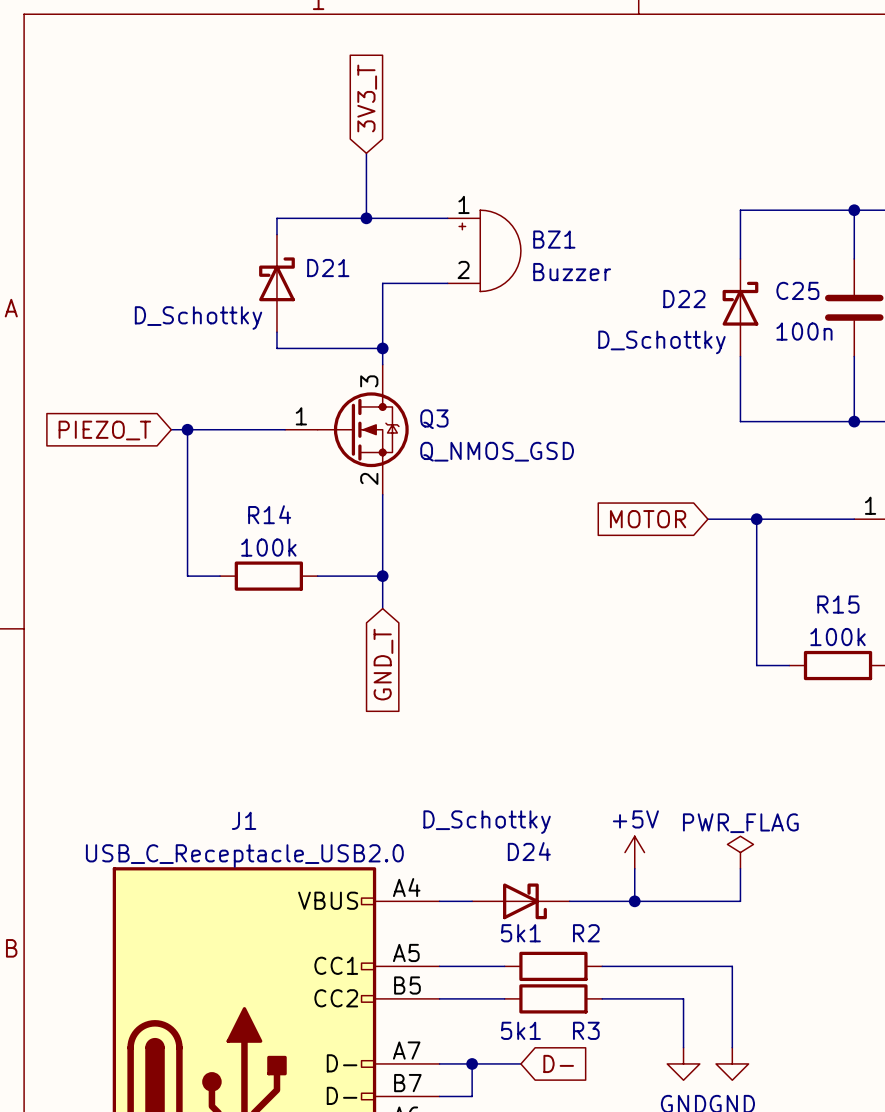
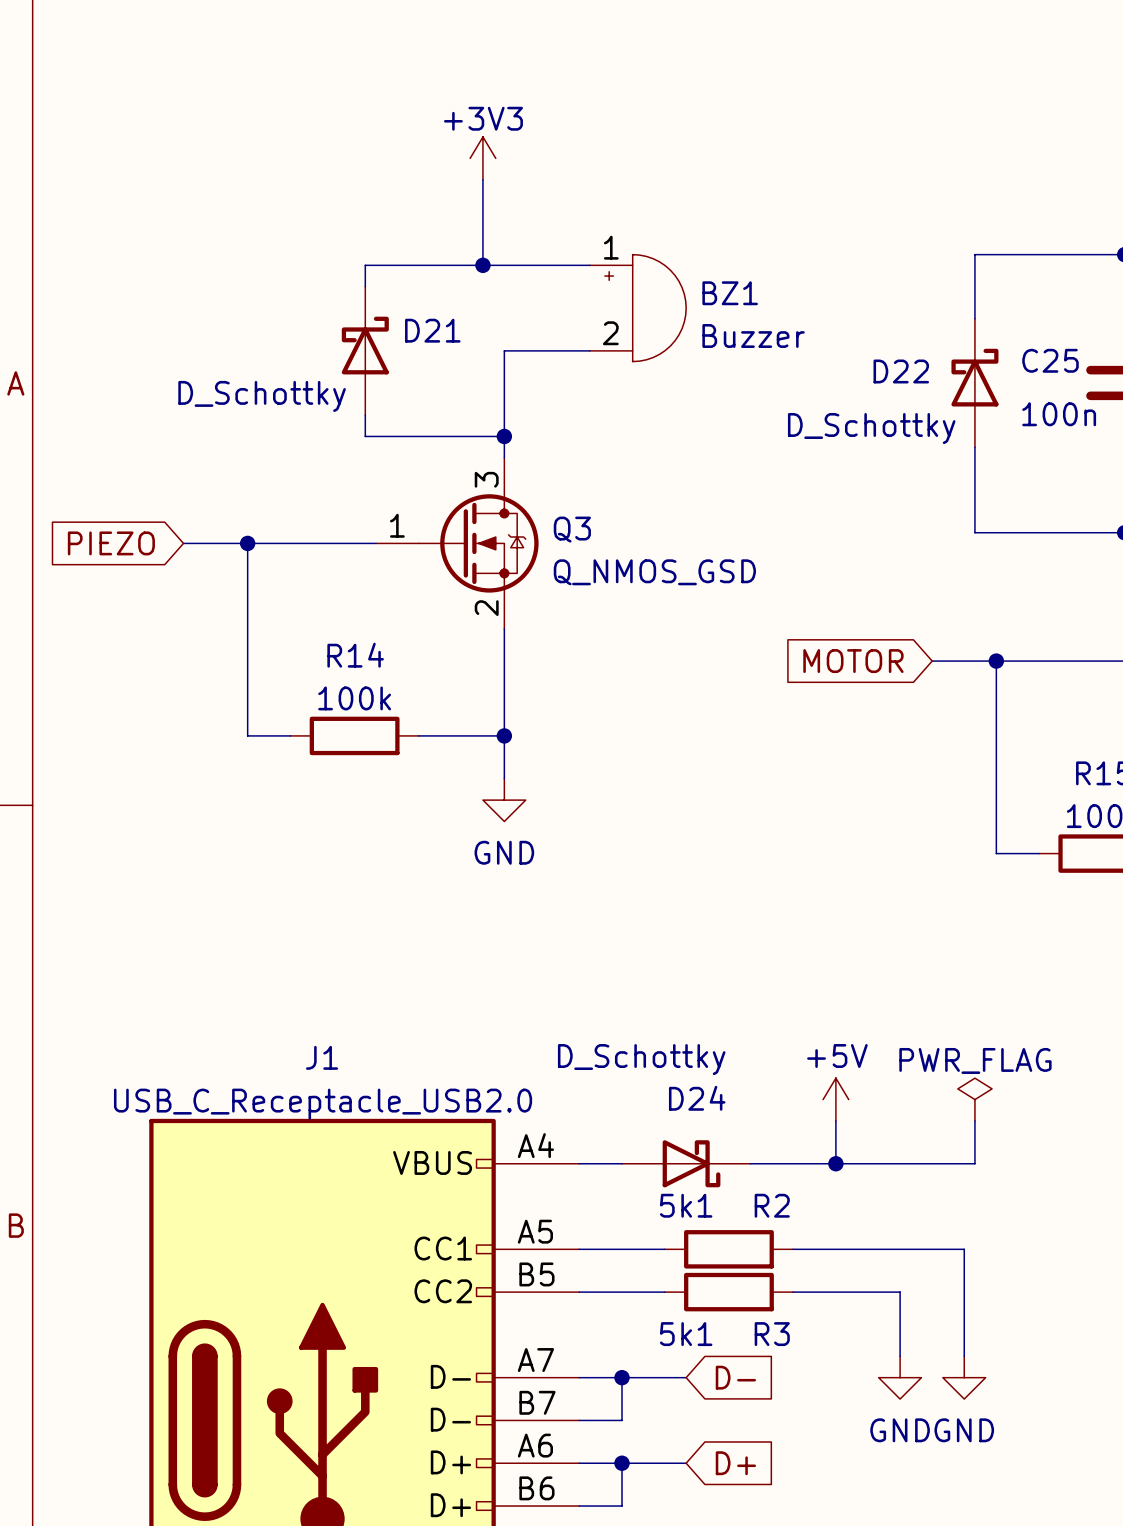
global label: 3V3_T (367, 98) -> none
power symbol: none -> +3V3 (482, 158)
wire: none -> (183, 543) (226, 543)
global label: PIEZO_T (104, 430) -> PIEZO (111, 543)
power symbol: none -> GND (504, 800)
global label: GND_T (383, 664) -> none

